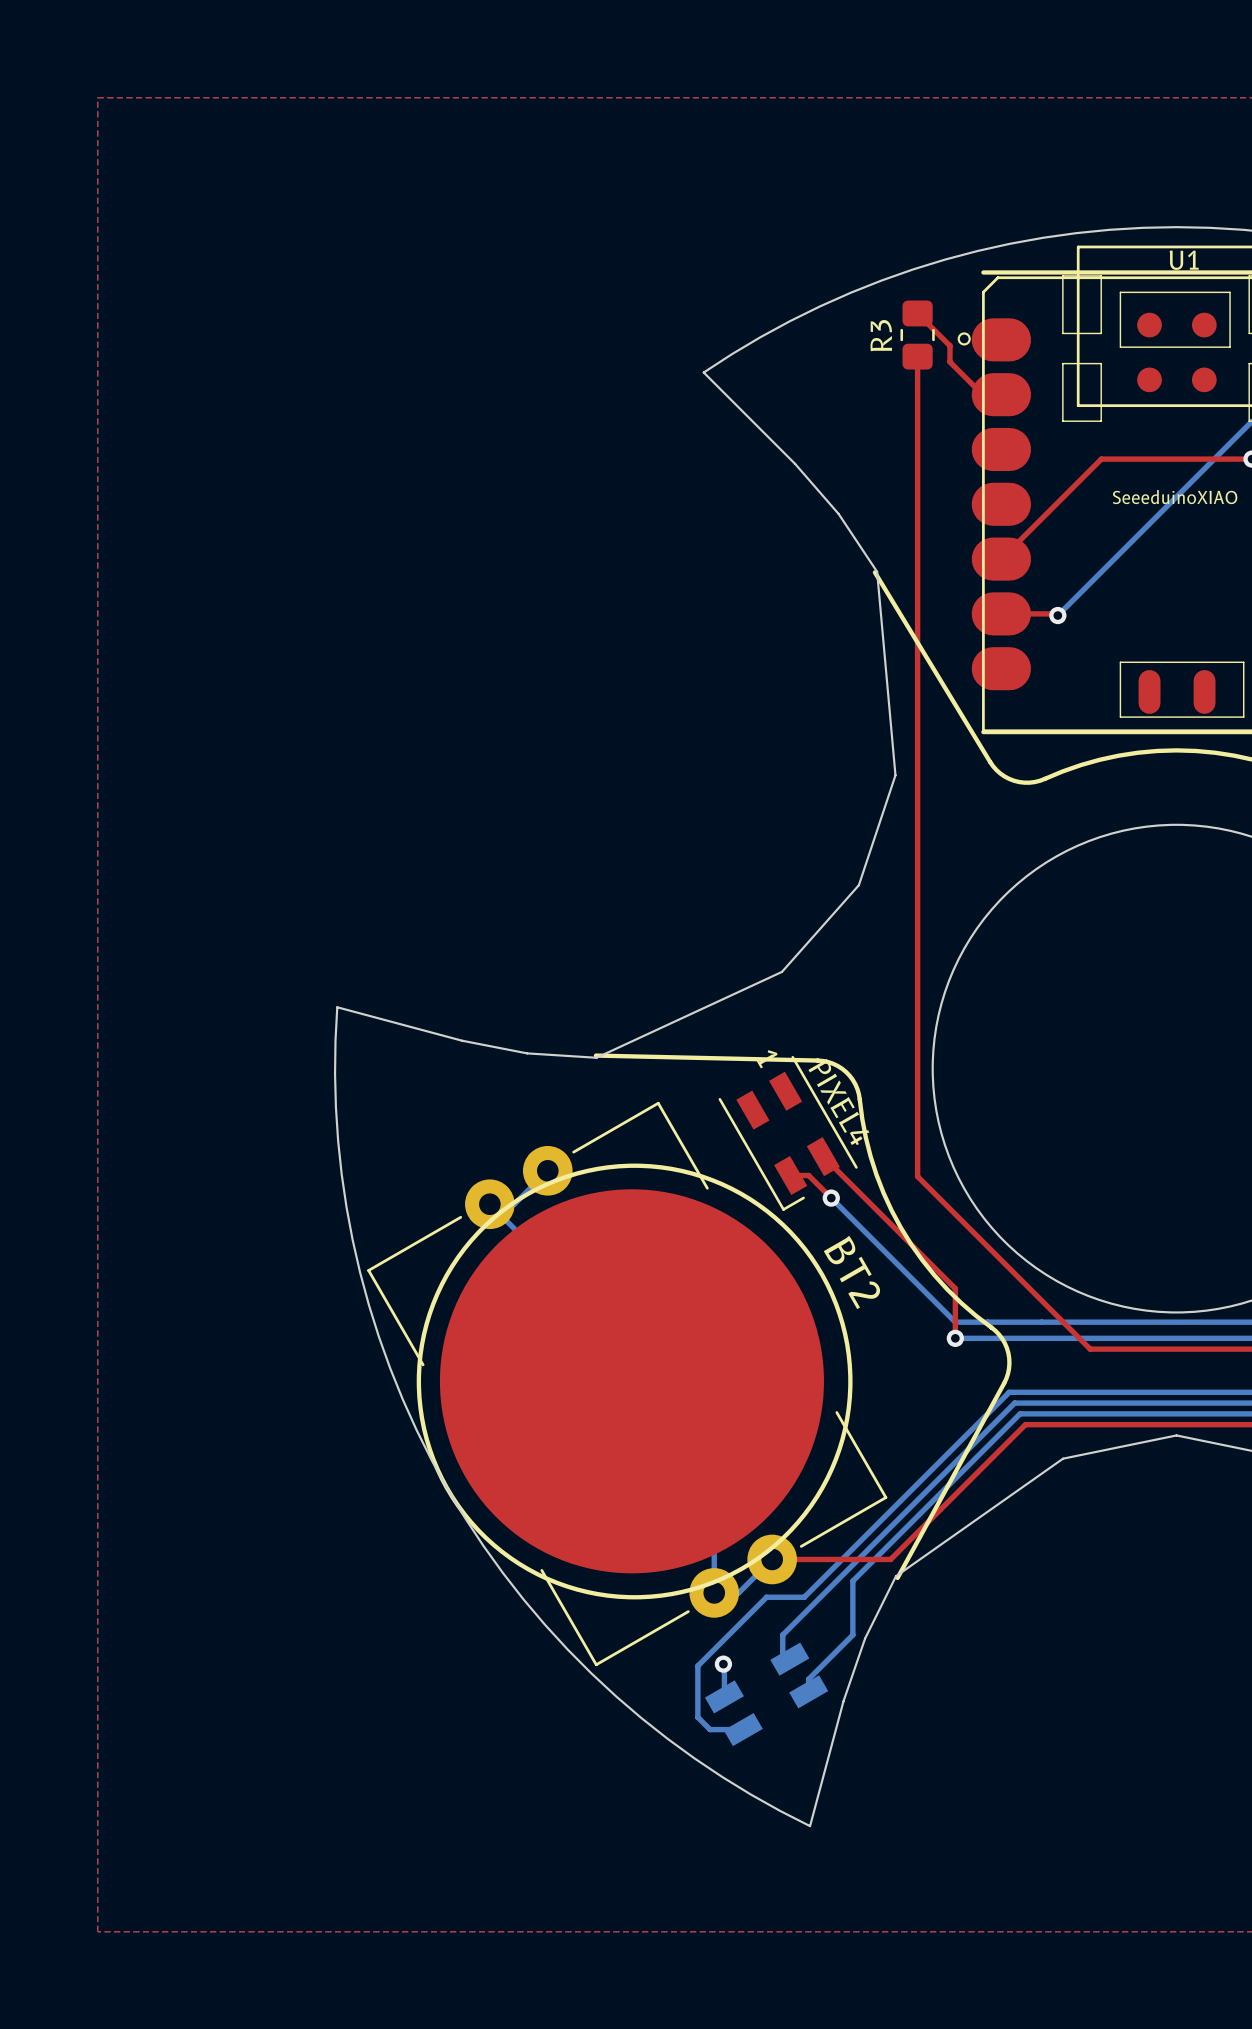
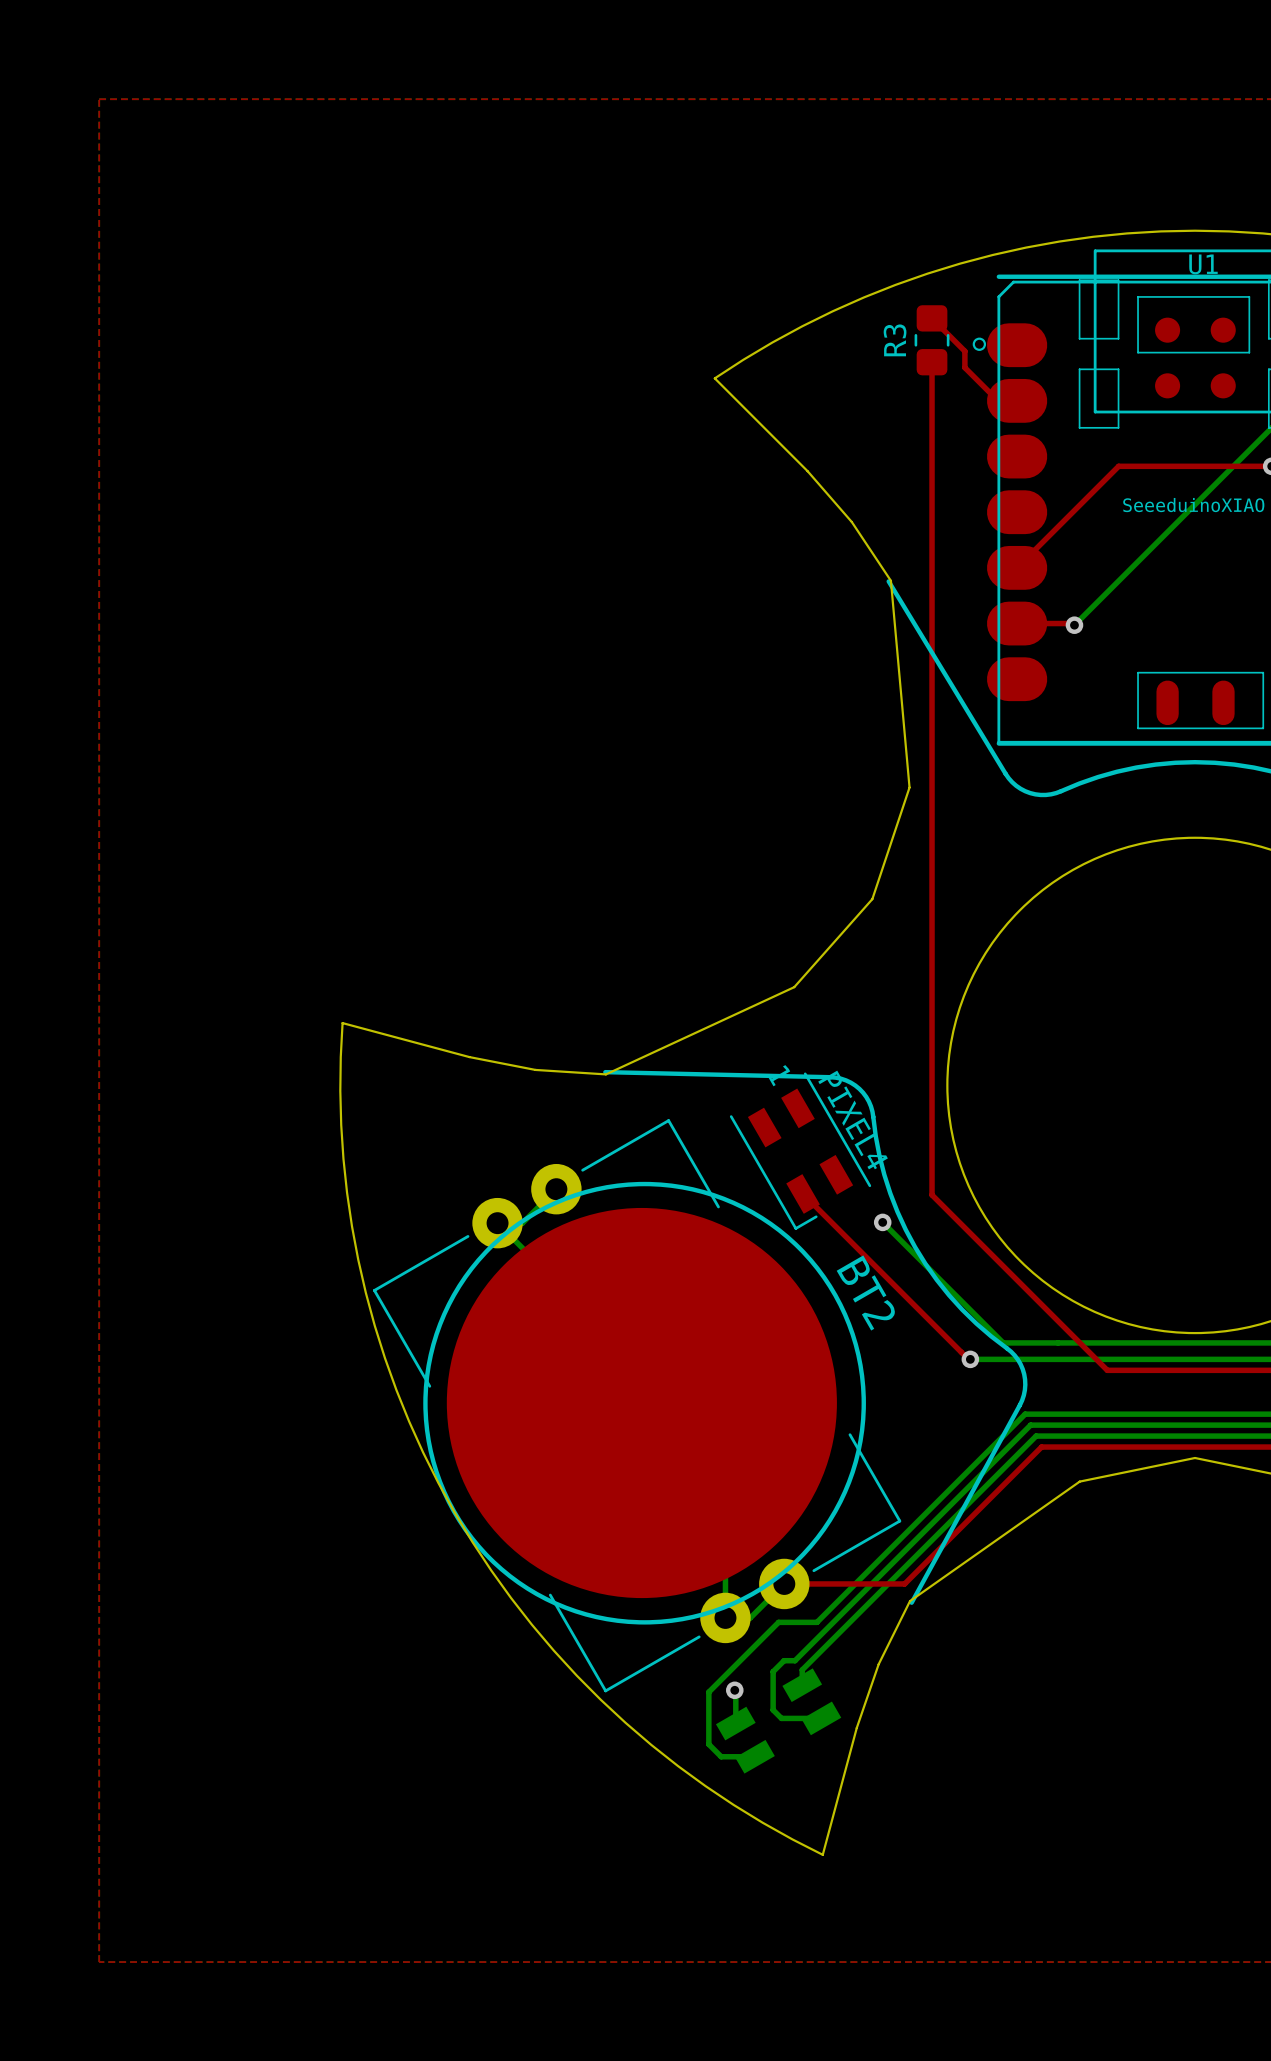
top track: (823, 1156) (955, 1288) (955, 1338) -> none
top track: (790, 1175) (808, 1175) (831, 1198) -> (803, 1193) (968, 1359)
bottom track: (831, 1198) (955, 1322) (987, 1322) -> (882, 1222) (1003, 1342)
via position: (831, 1198) -> (882, 1222)
bottom track: (852, 1581) (852, 1635) (808, 1679) (808, 1691) -> (866, 1605) (802, 1669) (802, 1685)
bottom track: (782, 1635) (782, 1652) (789, 1659) -> (795, 1660) (784, 1660) (773, 1671) (773, 1710) (781, 1718) (821, 1718)

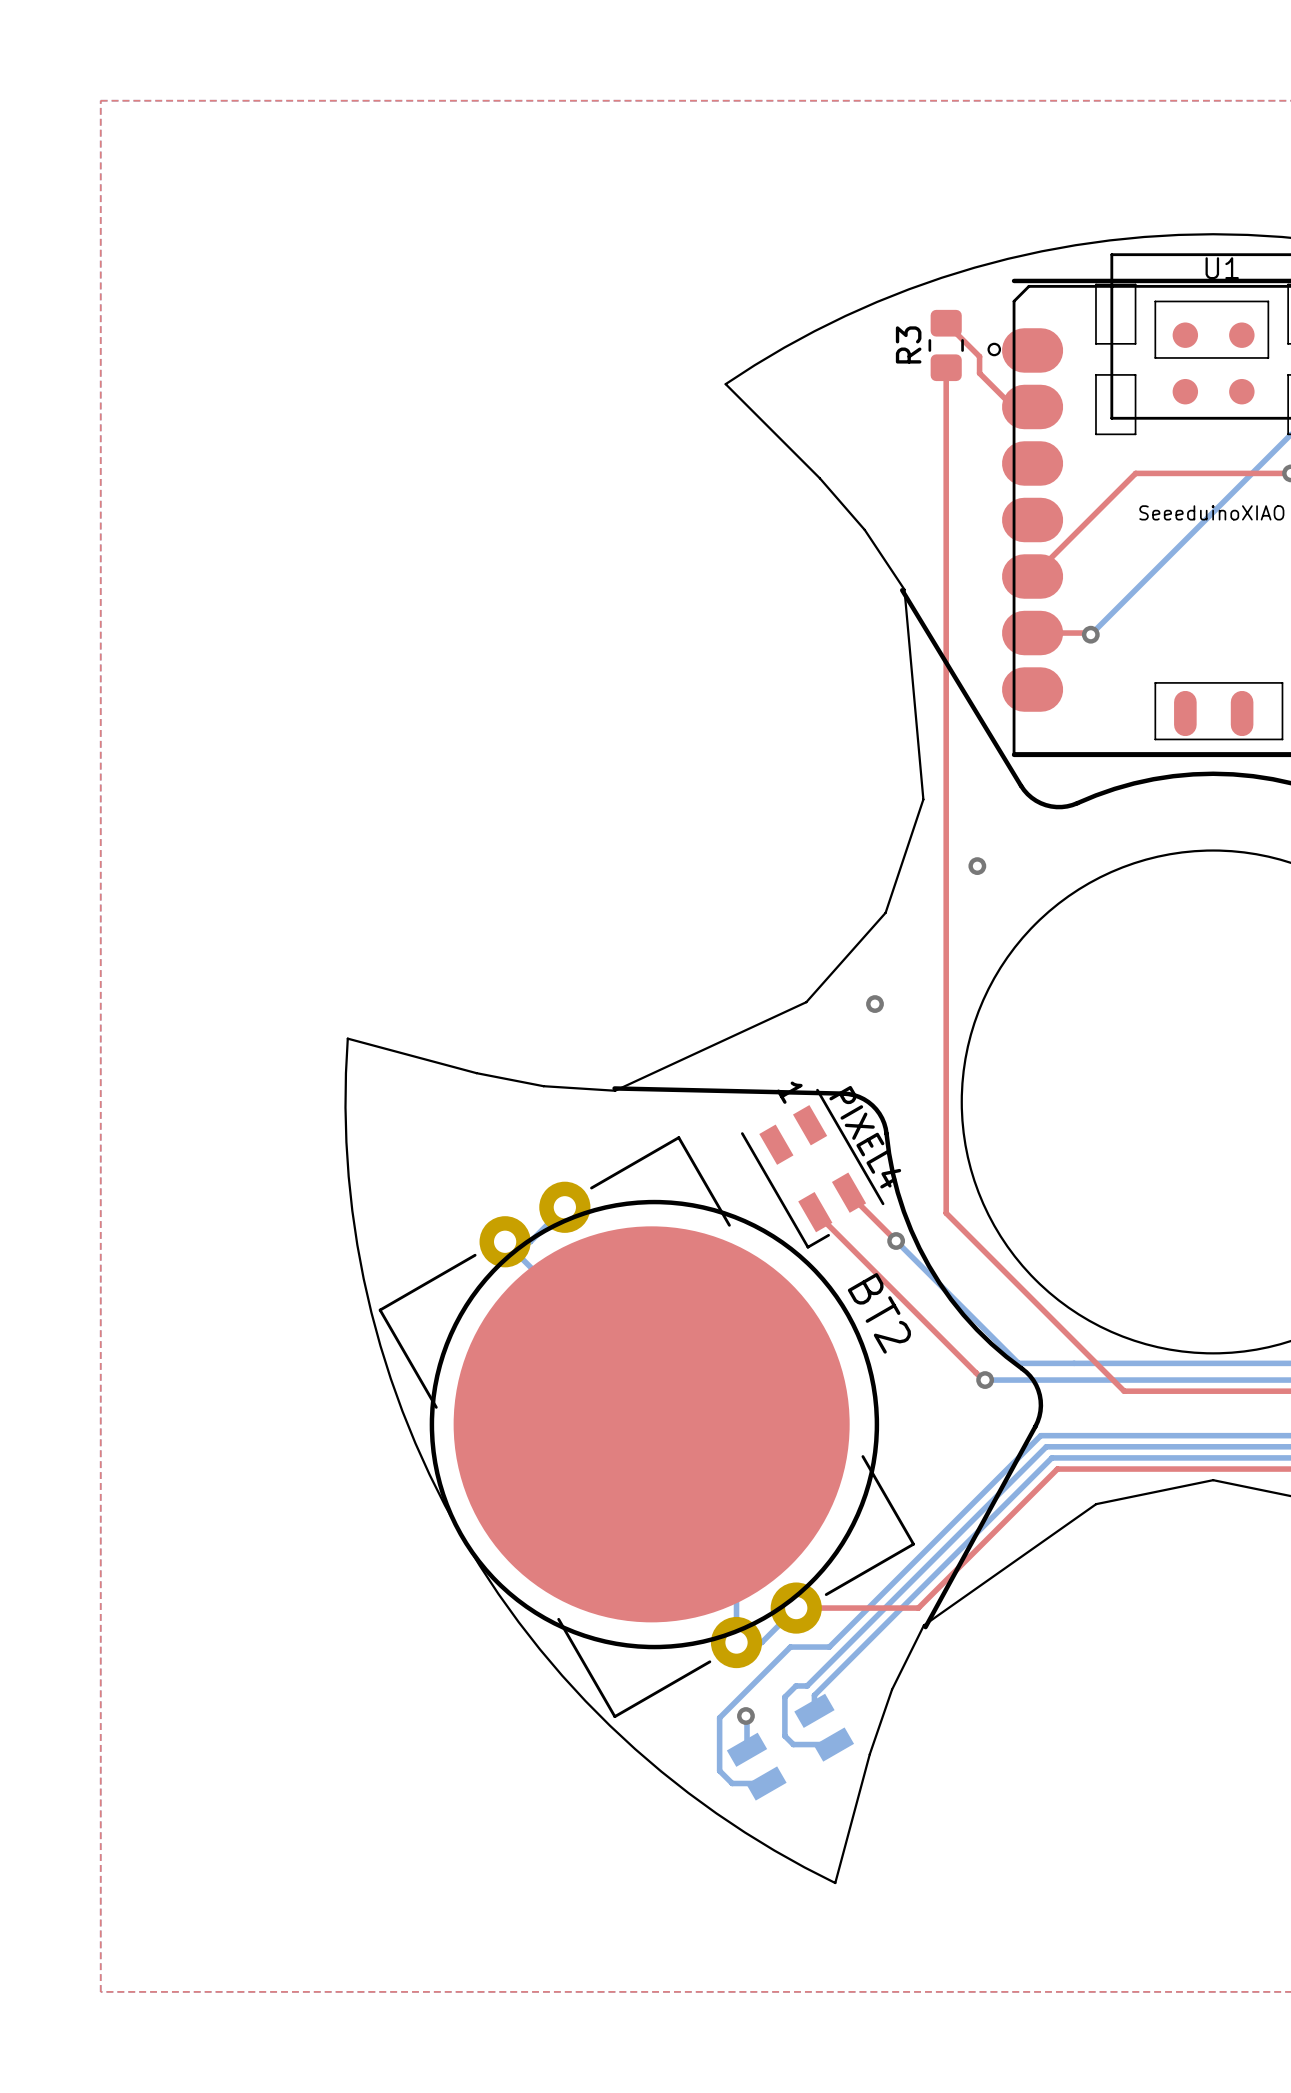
via: none -> (977, 866)
via: none -> (875, 1004)
top track: none -> (849, 1193) (896, 1240)

